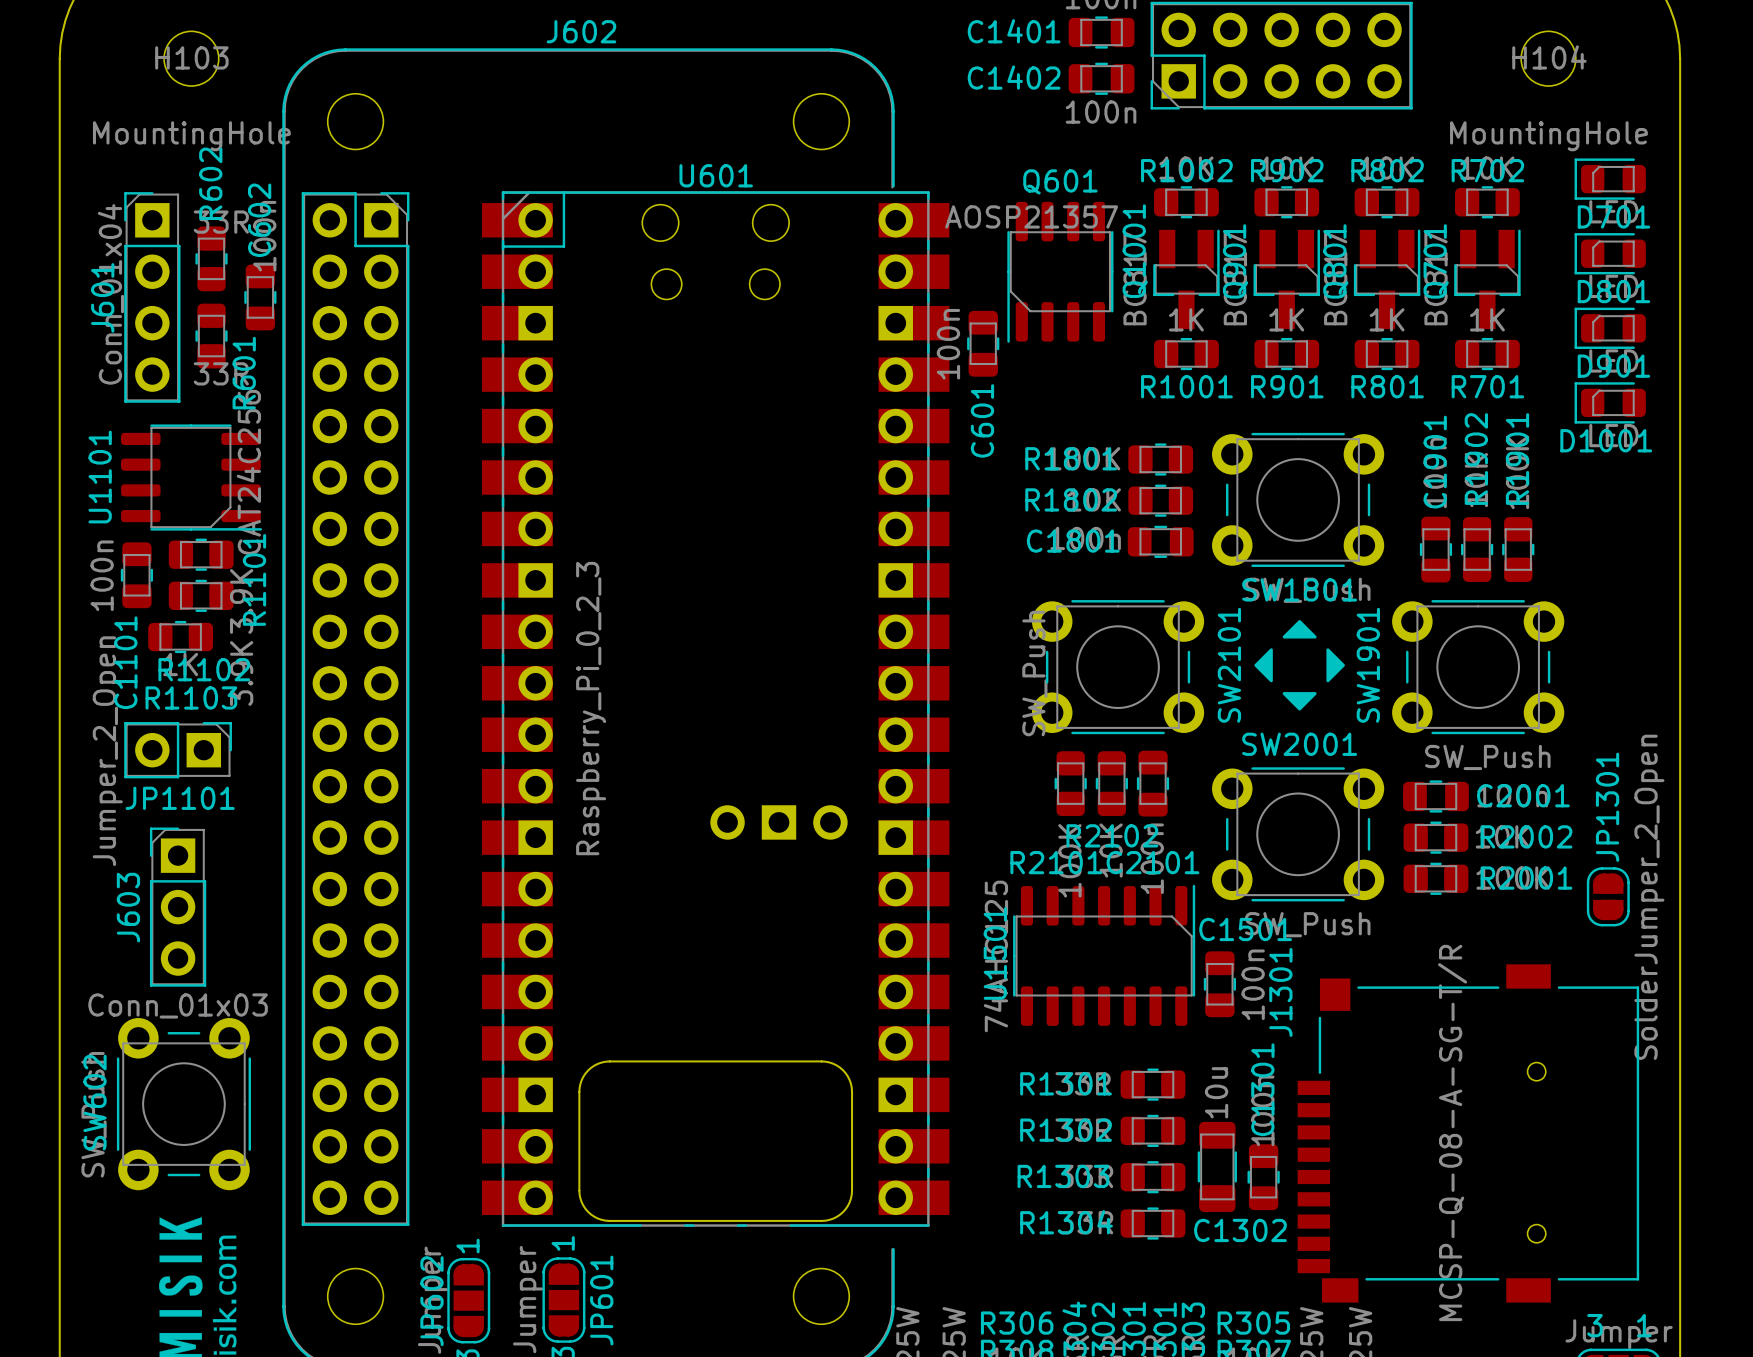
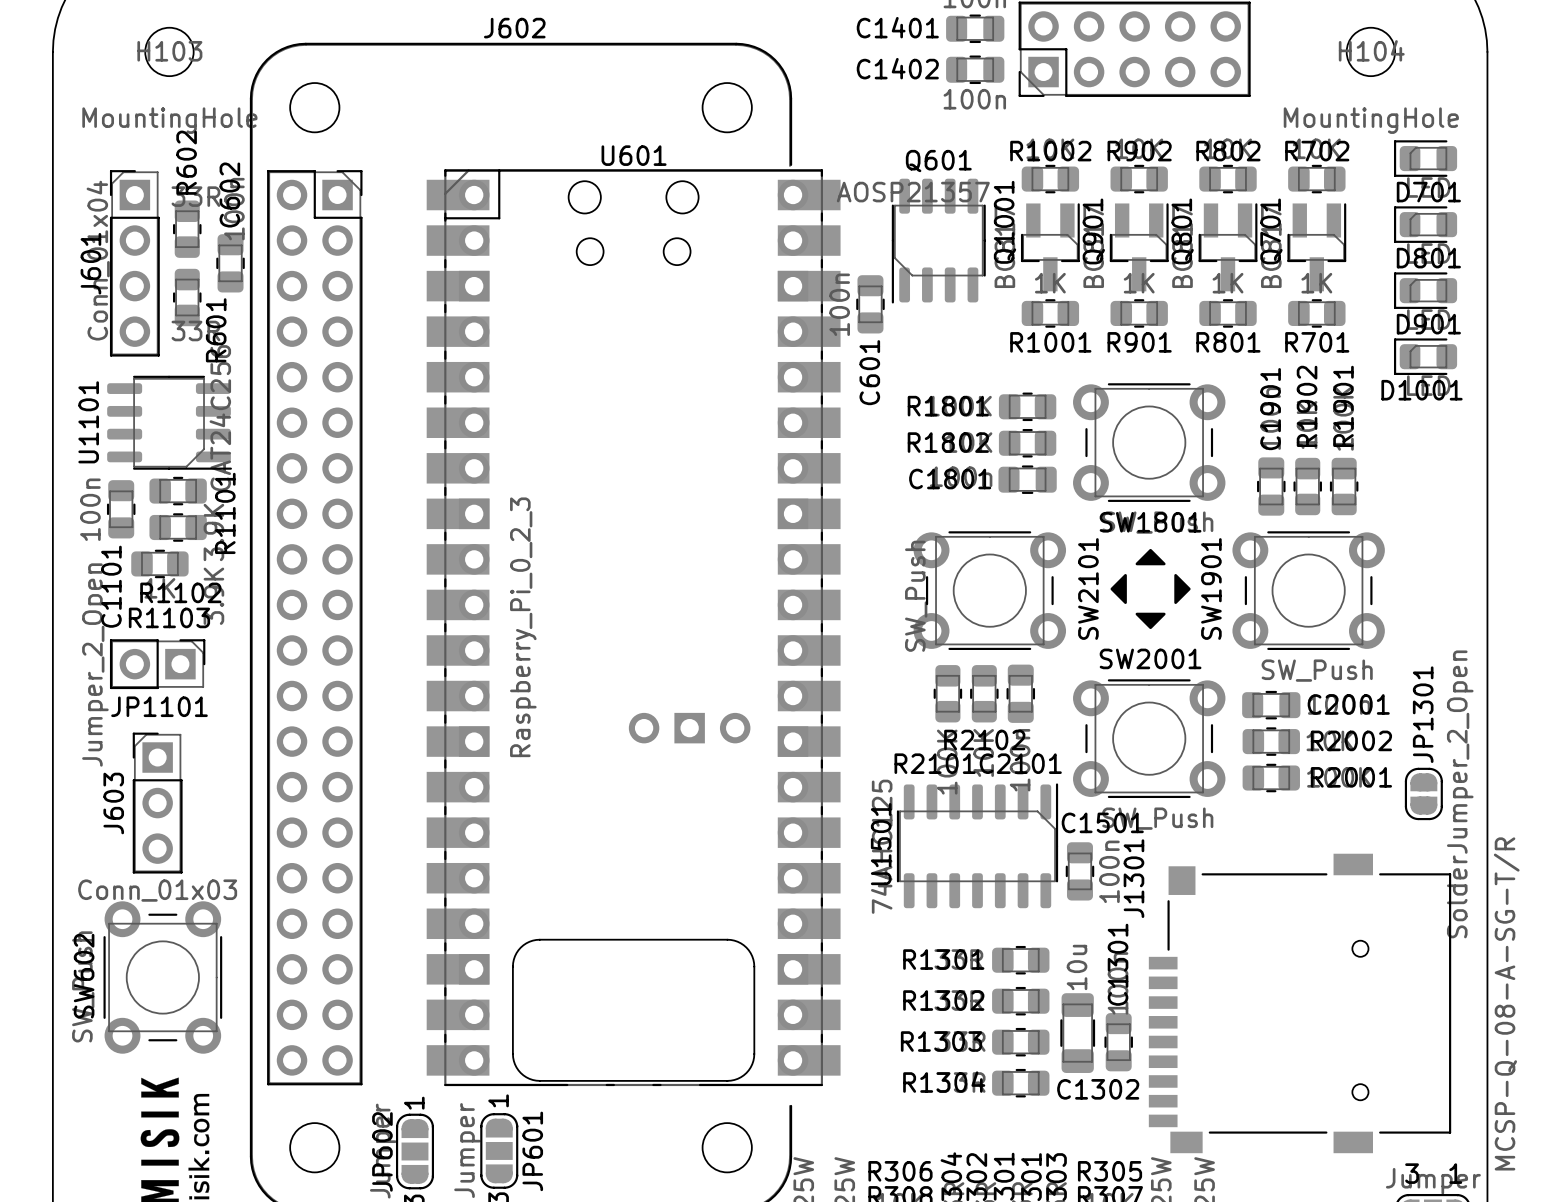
J1301 value position: MCSP-Q-08-A-SG-T/R (1452, 1132) -> MCSP-Q-08-A-SG-T/R (1506, 1003)

